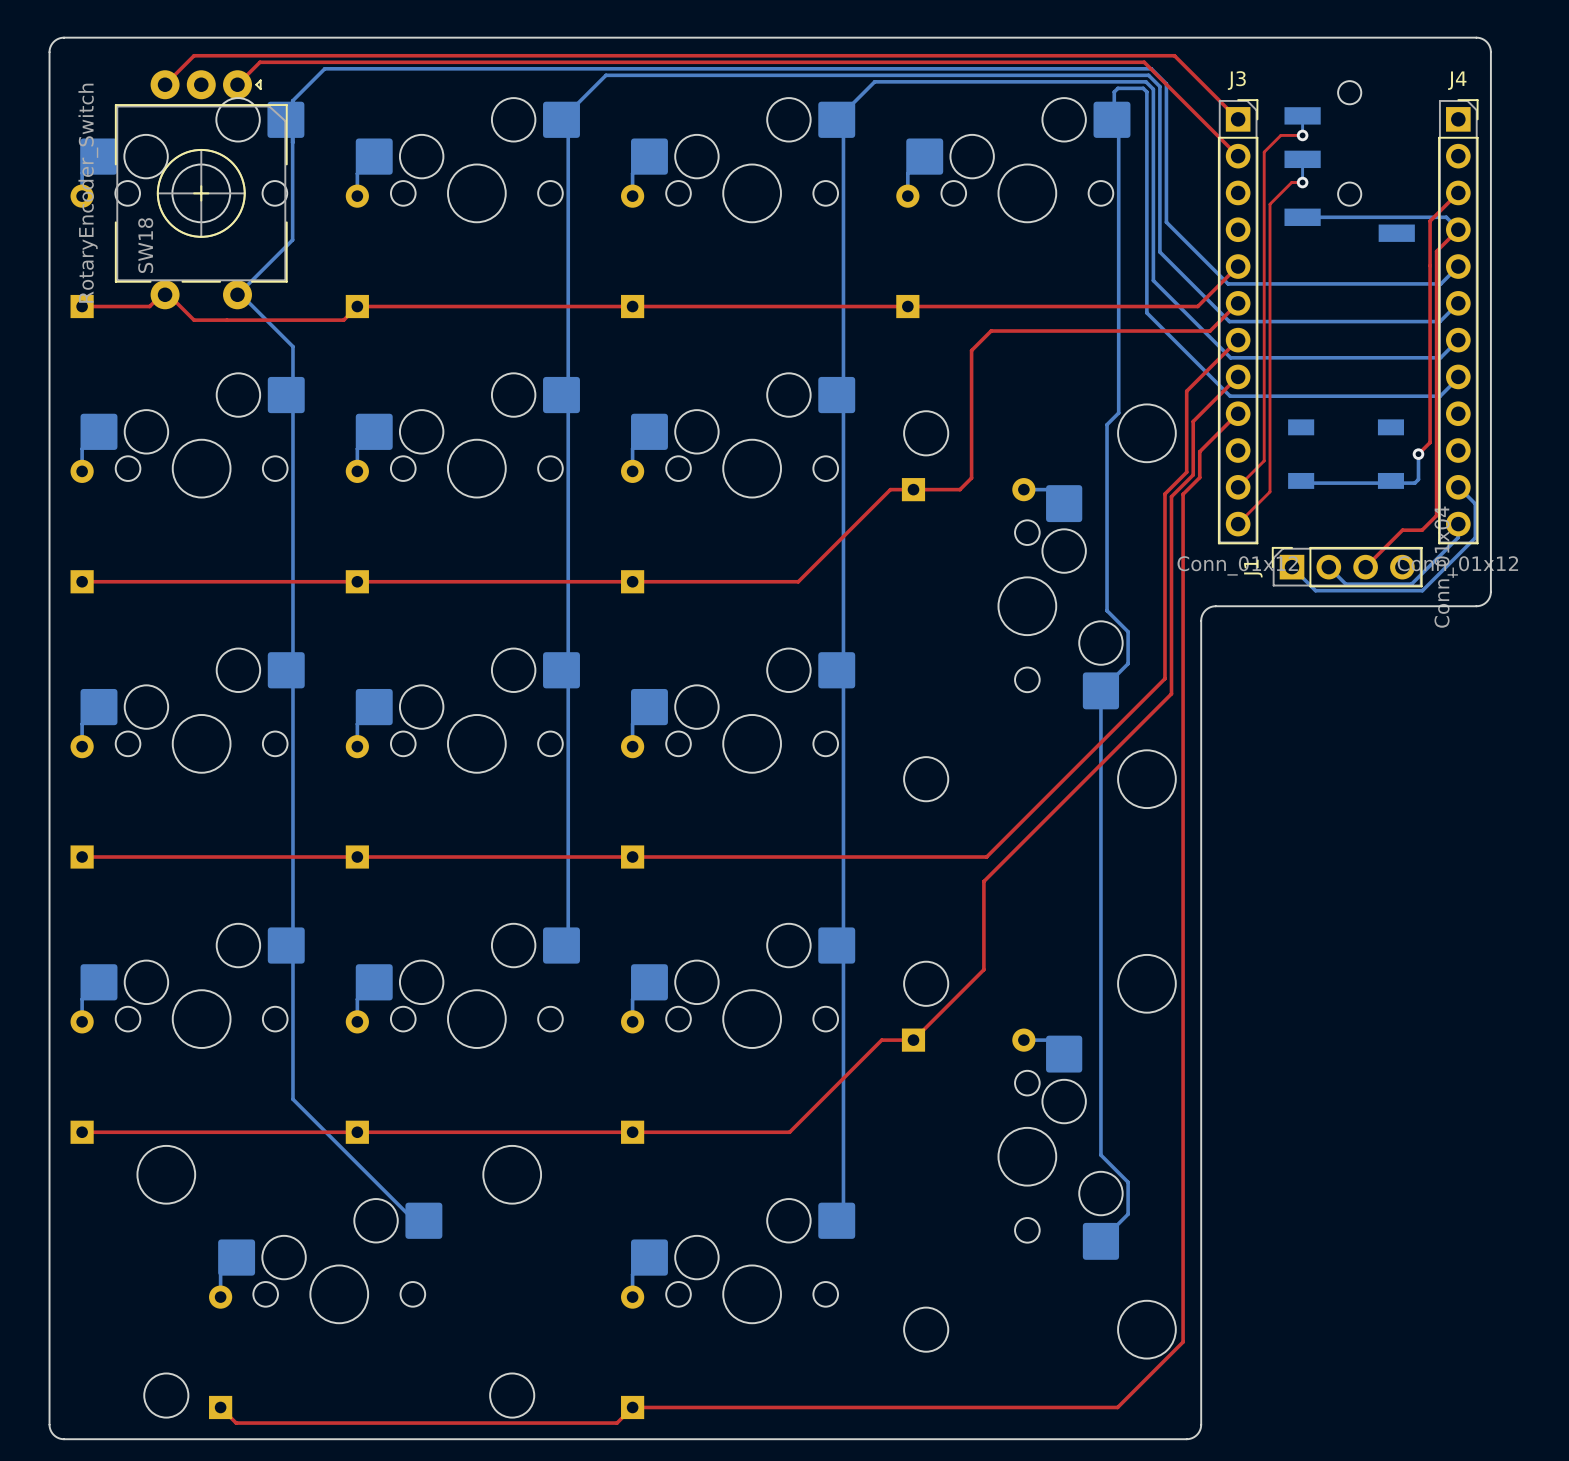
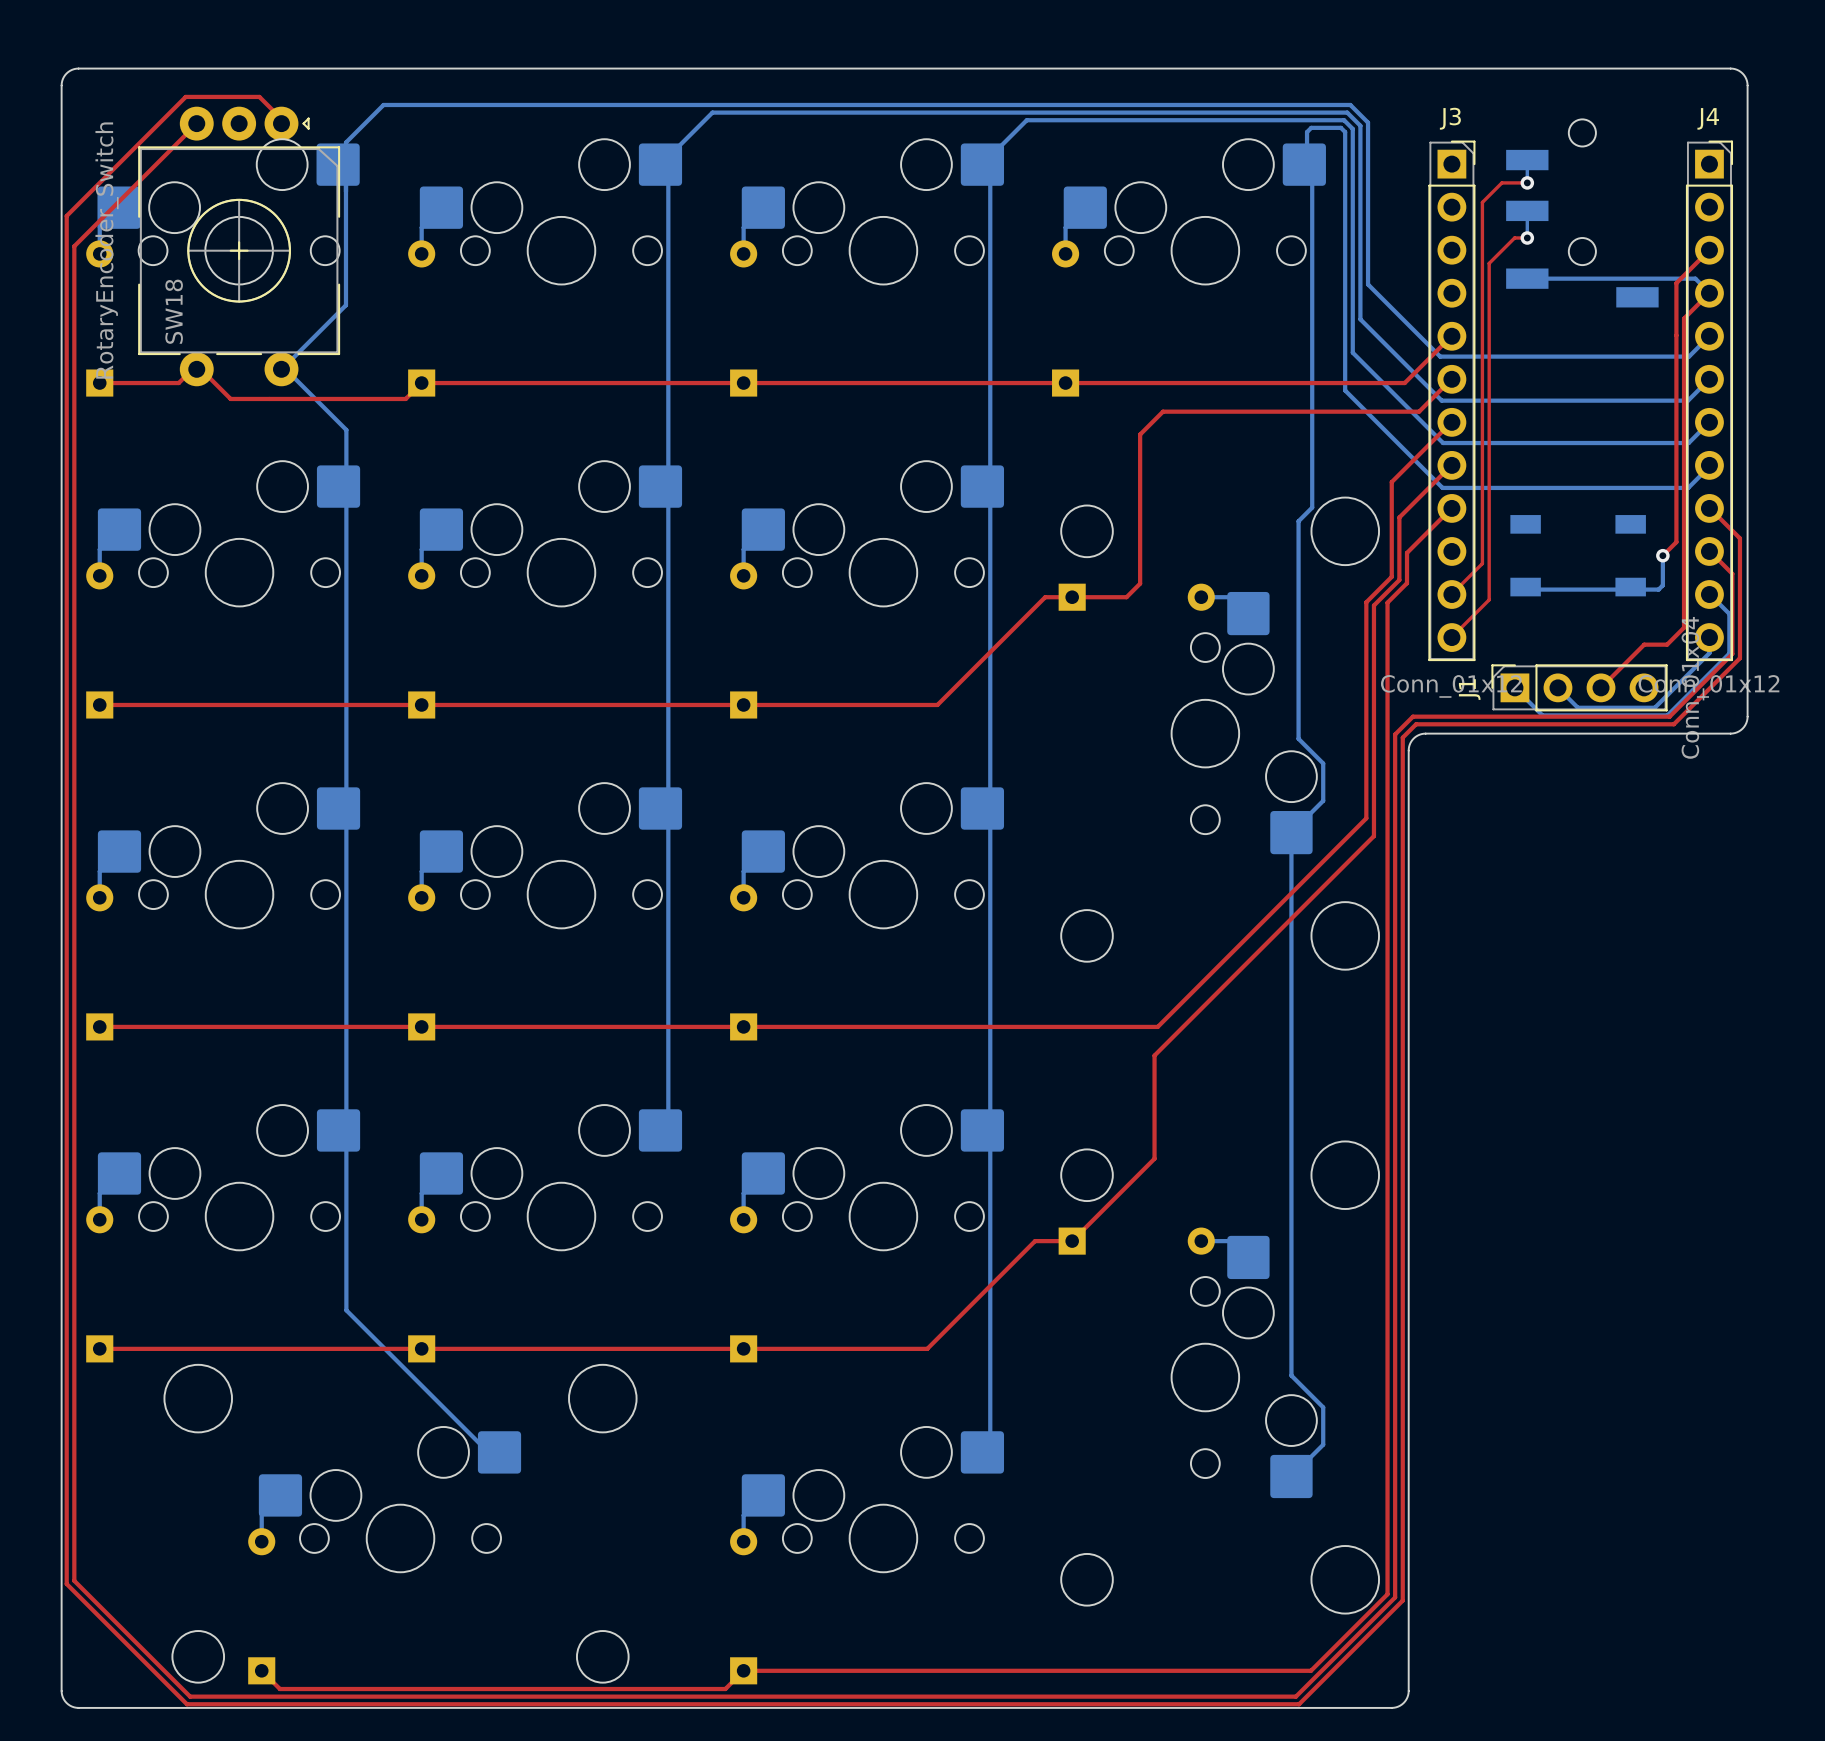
top track: none -> (281, 119) (259, 96) (185, 96) (66, 215) (66, 1584) (186, 1704) (1299, 1704) (1402, 1600) (1402, 737) (1416, 724) (1673, 724) (1739, 658) (1739, 538) (1709, 508)
top track: (165, 84) (194, 55) (1174, 55) (1238, 119) -> (196, 123) (74, 246) (74, 1580) (190, 1696) (1295, 1696) (1395, 1597) (1395, 734) (1412, 716) (1669, 716) (1732, 653) (1732, 573) (1709, 551)
top track: (237, 84) (259, 62) (1144, 62) (1238, 156) -> none

